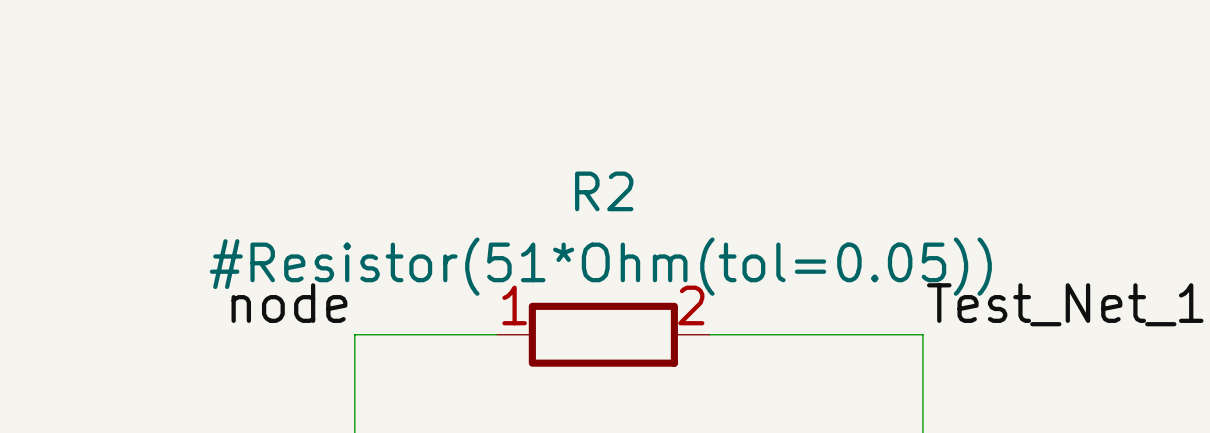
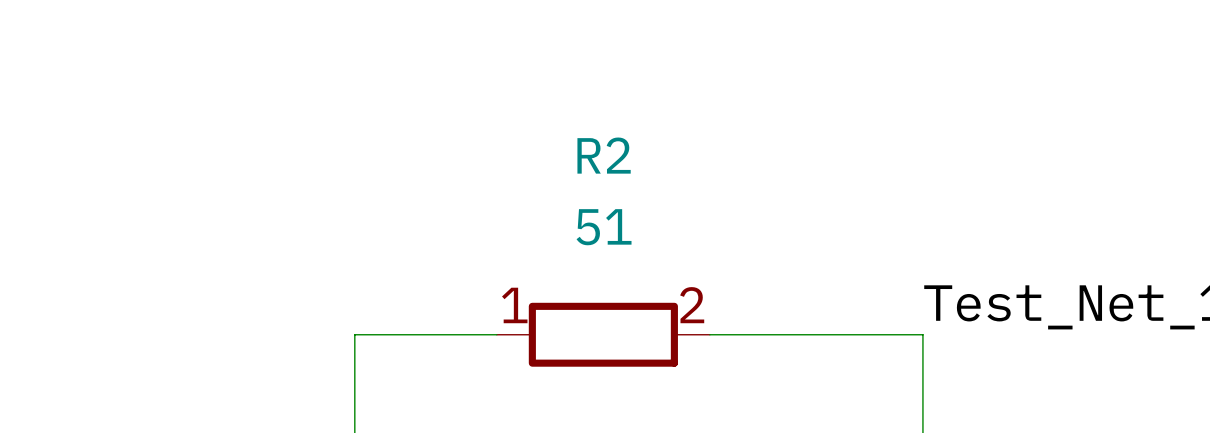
R2 name position: R2 (604, 191) -> R2 (604, 155)
R2 value: #Resistor(51*Ohm(tol=0.05)) (600, 266) -> 51 (604, 227)
label: node (289, 303) -> none

